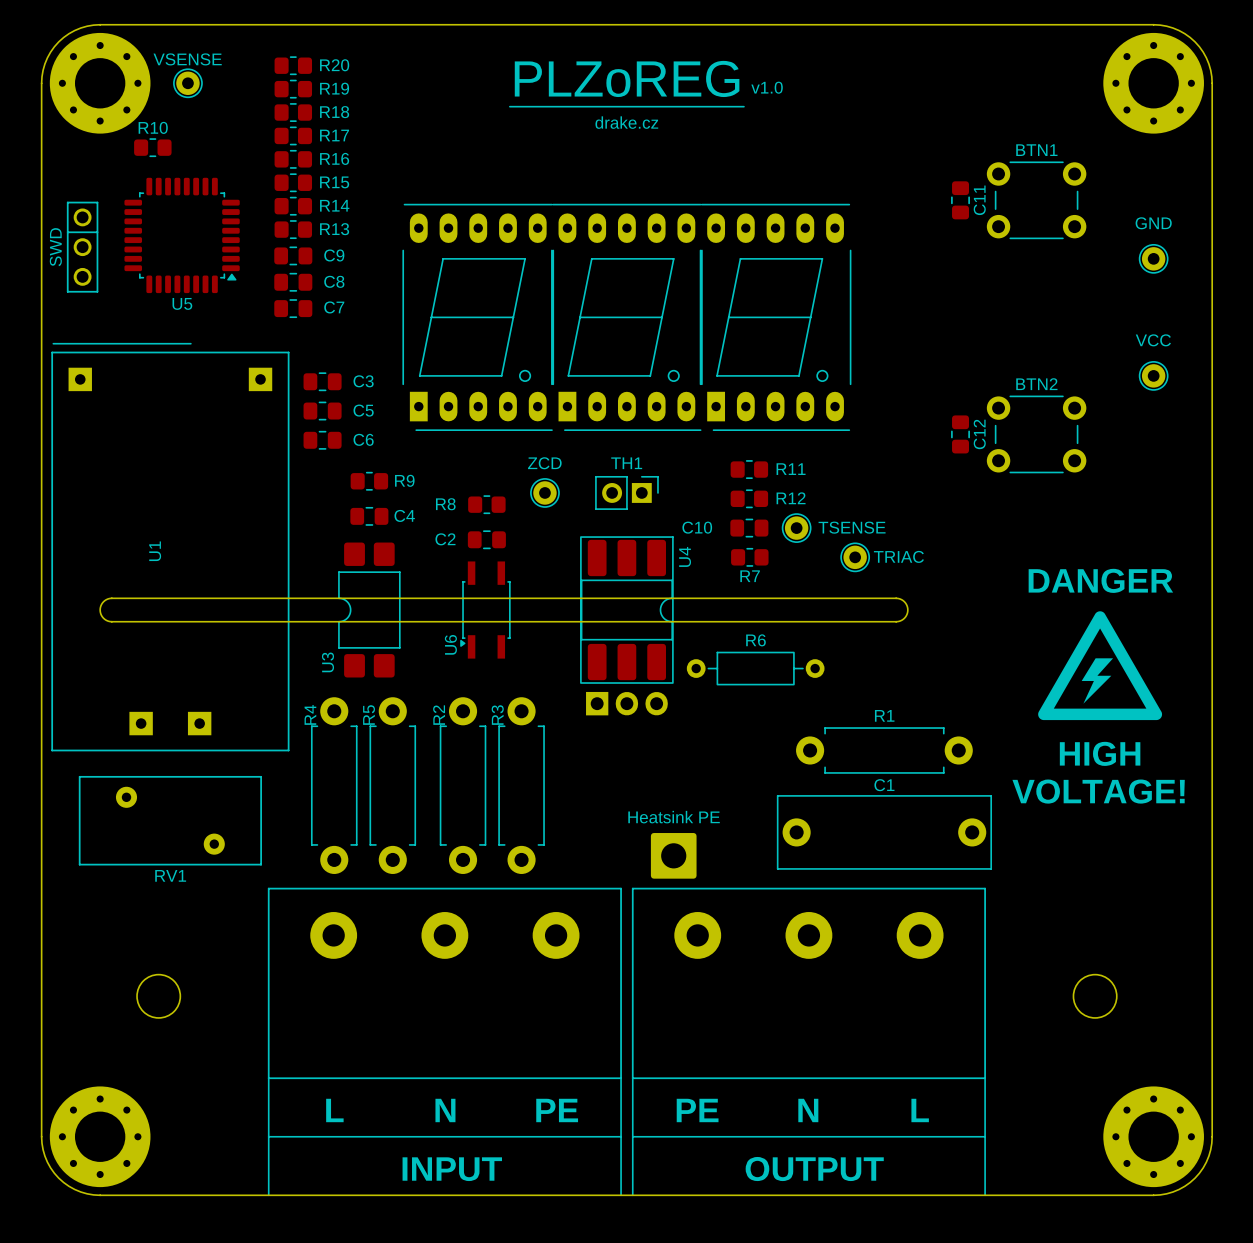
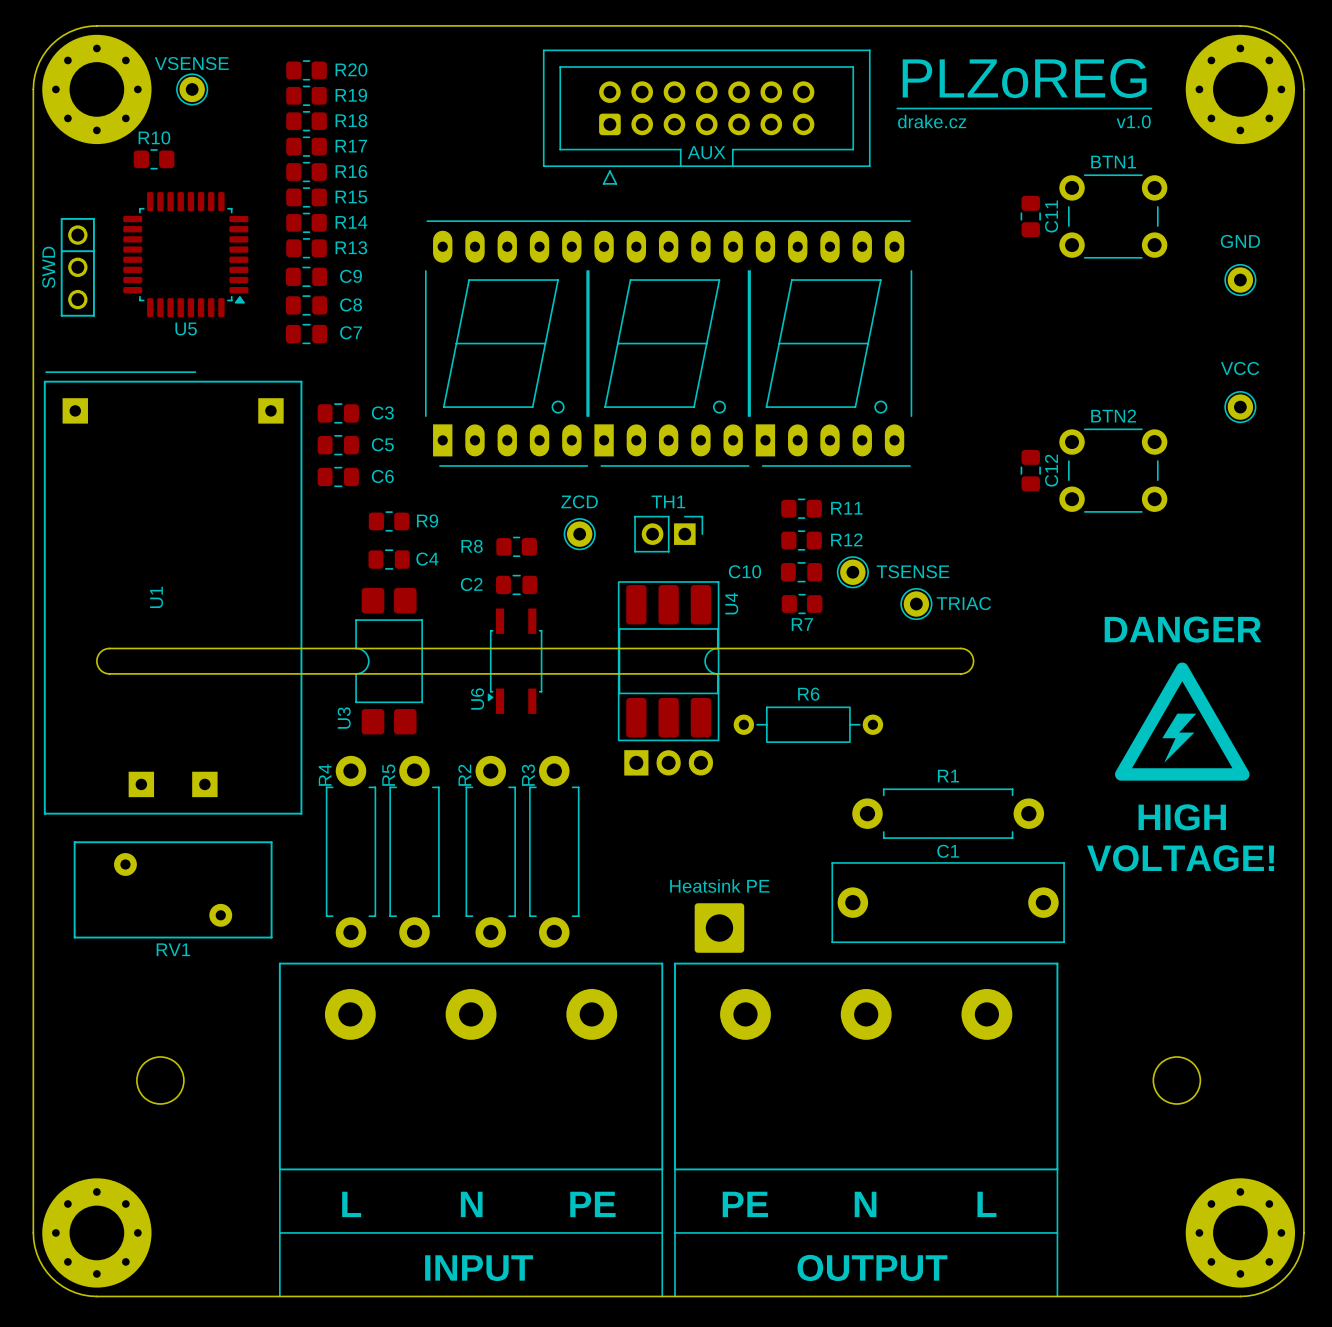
text: none -> PLZoREG (1024, 78)
text: PLZoREG (627, 78) -> none
text: v1.0 (767, 87) -> none
line: none -> (897, 108) (1151, 108)
line: (509, 106) (743, 106) -> none
part: none -> AUX (706, 117)
text: none -> v1.0 (1133, 121)
text position: drake.cz (626, 122) -> drake.cz (932, 121)

